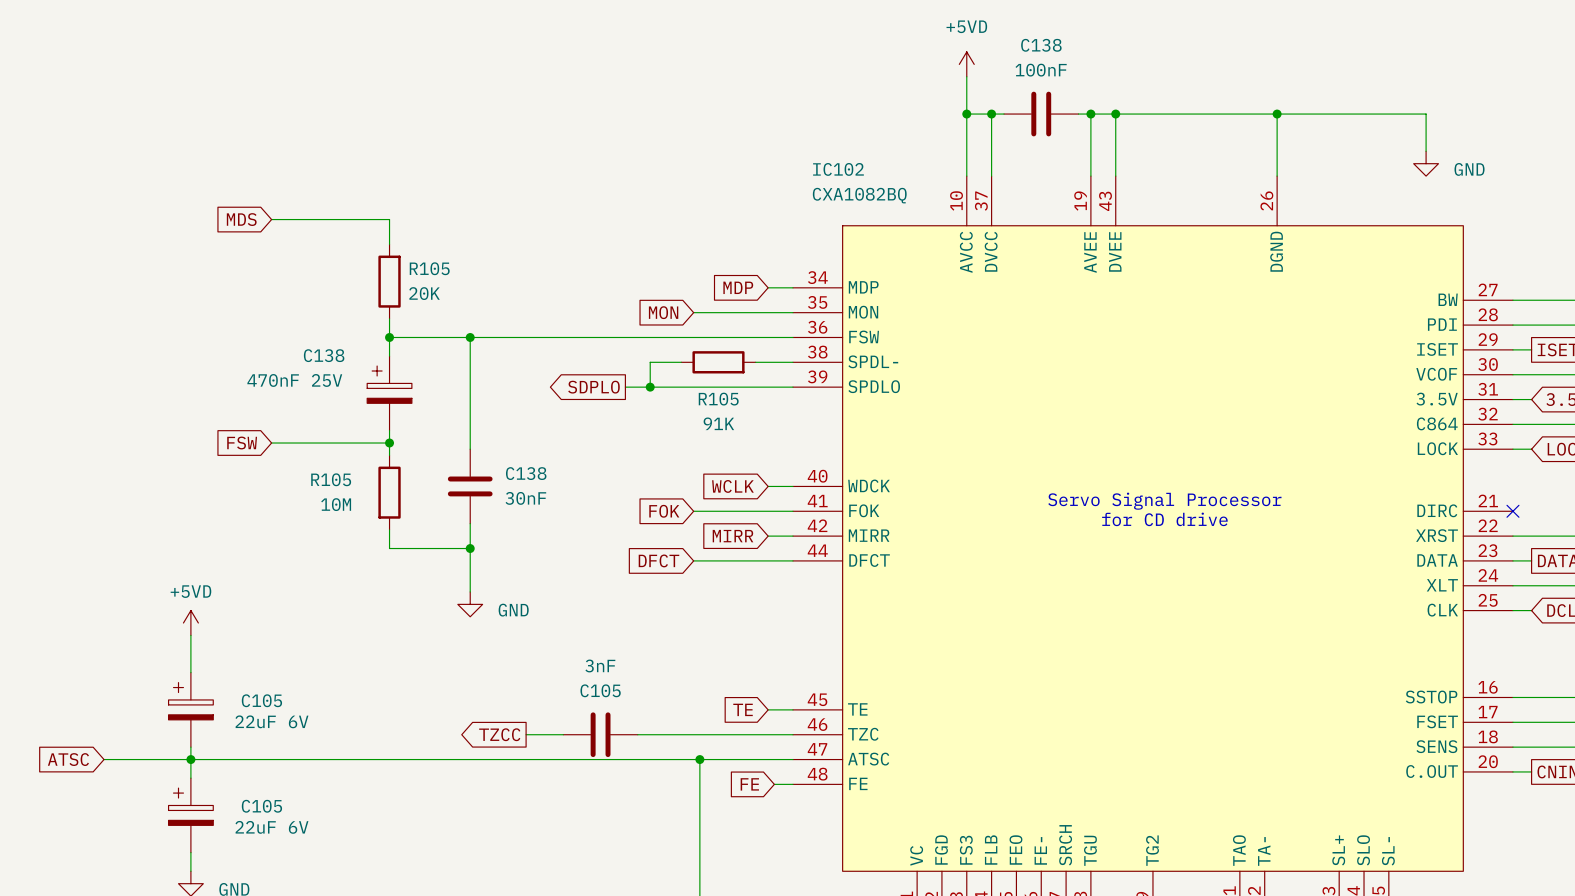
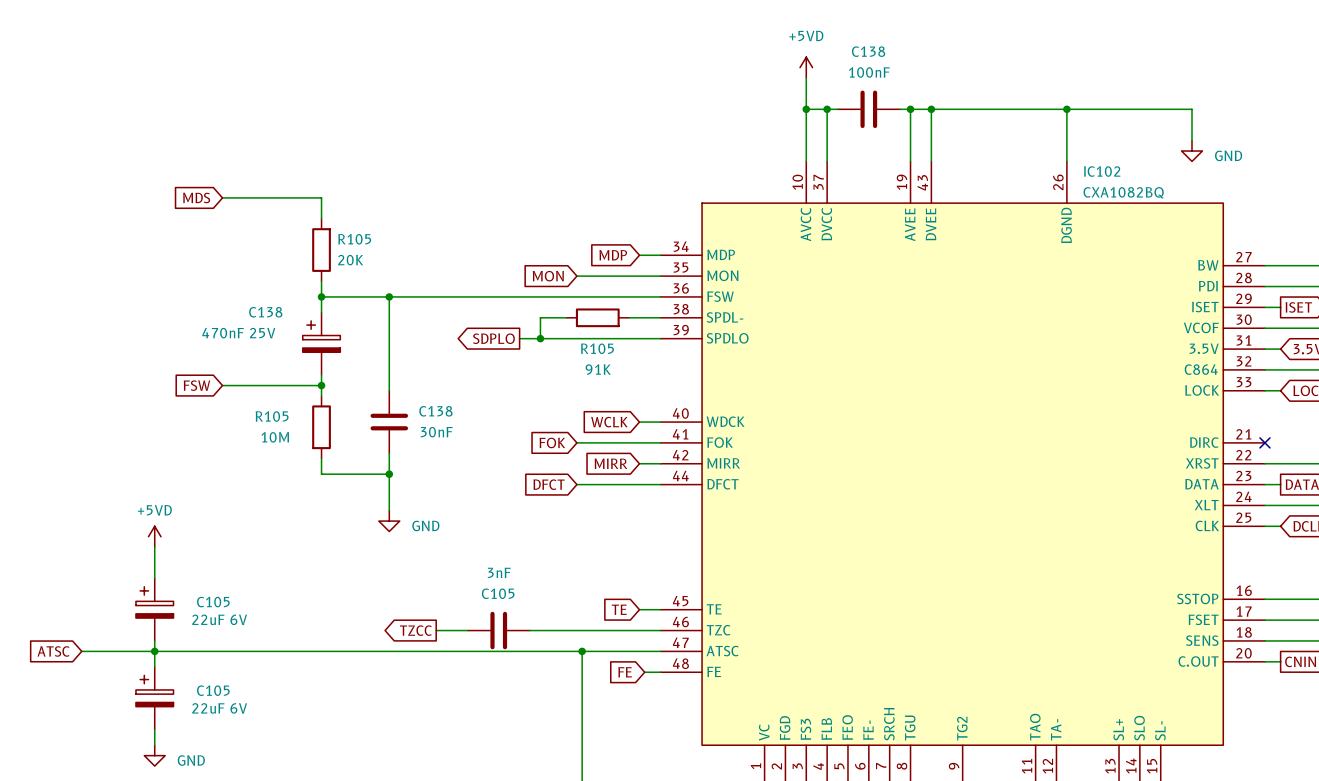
IC102 name position: IC102 (838, 169) -> IC102 (1102, 171)
IC102 value position: CXA1082BQ (859, 195) -> CXA1082BQ (1123, 192)
text: Servo Signal Processor (1164, 501) -> none
text: for CD drive (1164, 519) -> none

